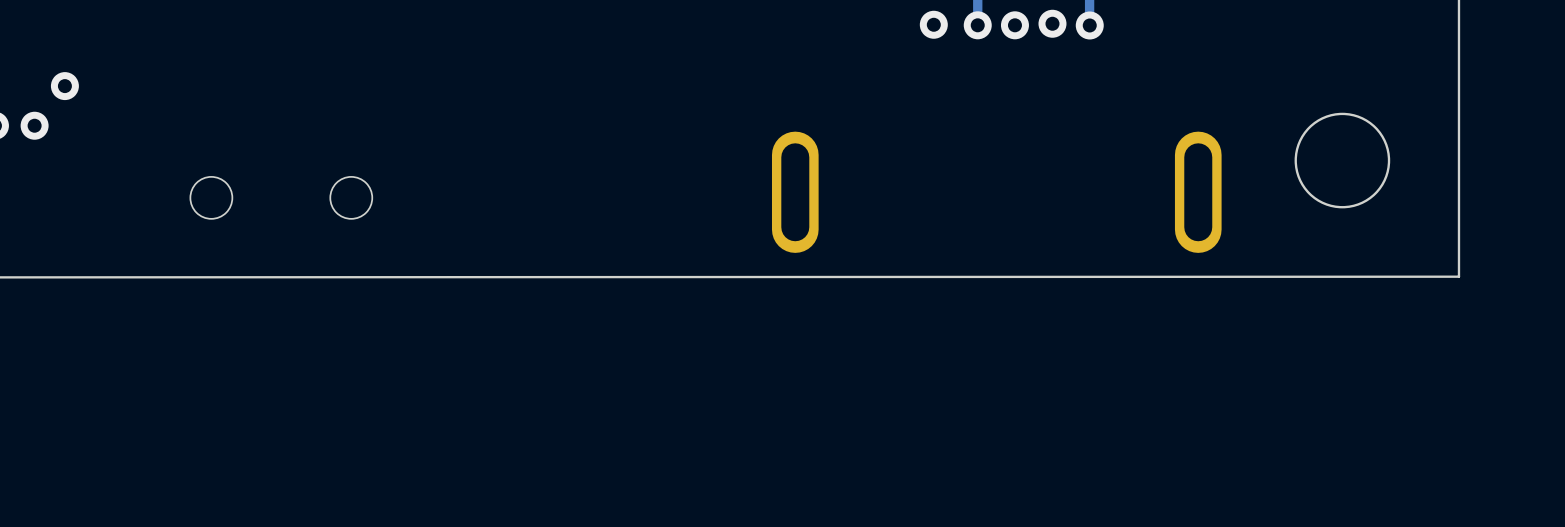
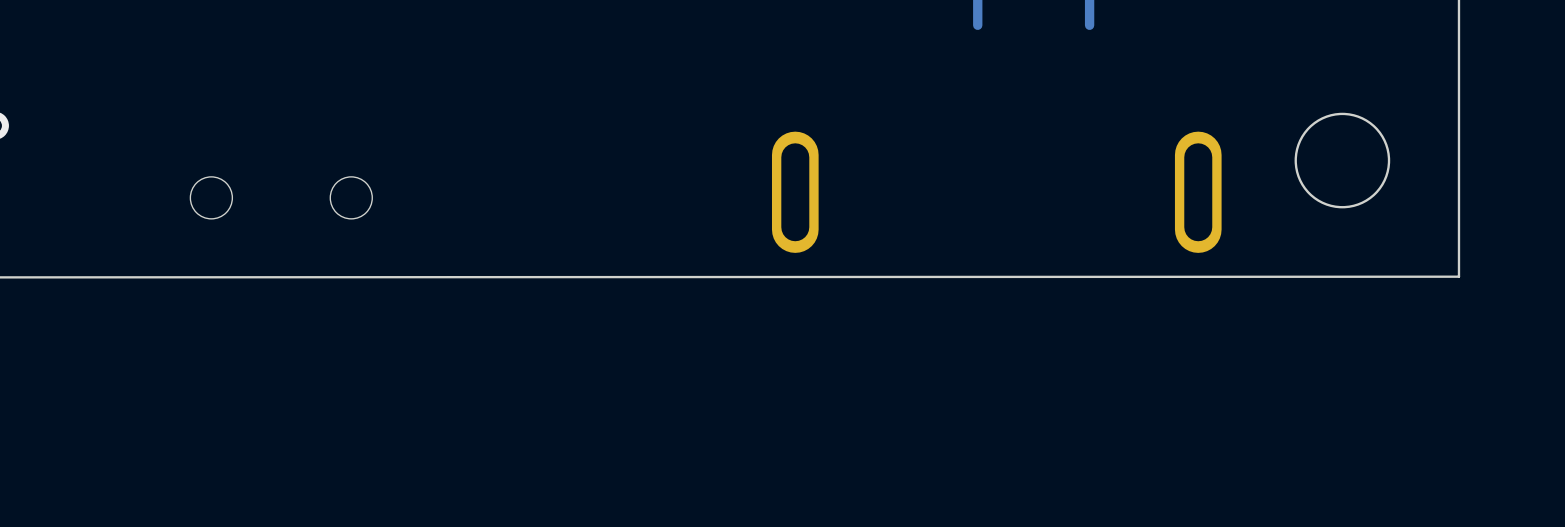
via: (1052, 23) -> none
via: (933, 24) -> none
via: (977, 25) -> none
via: (1014, 25) -> none
via: (1089, 25) -> none
via: (64, 86) -> none
via: (34, 125) -> none

